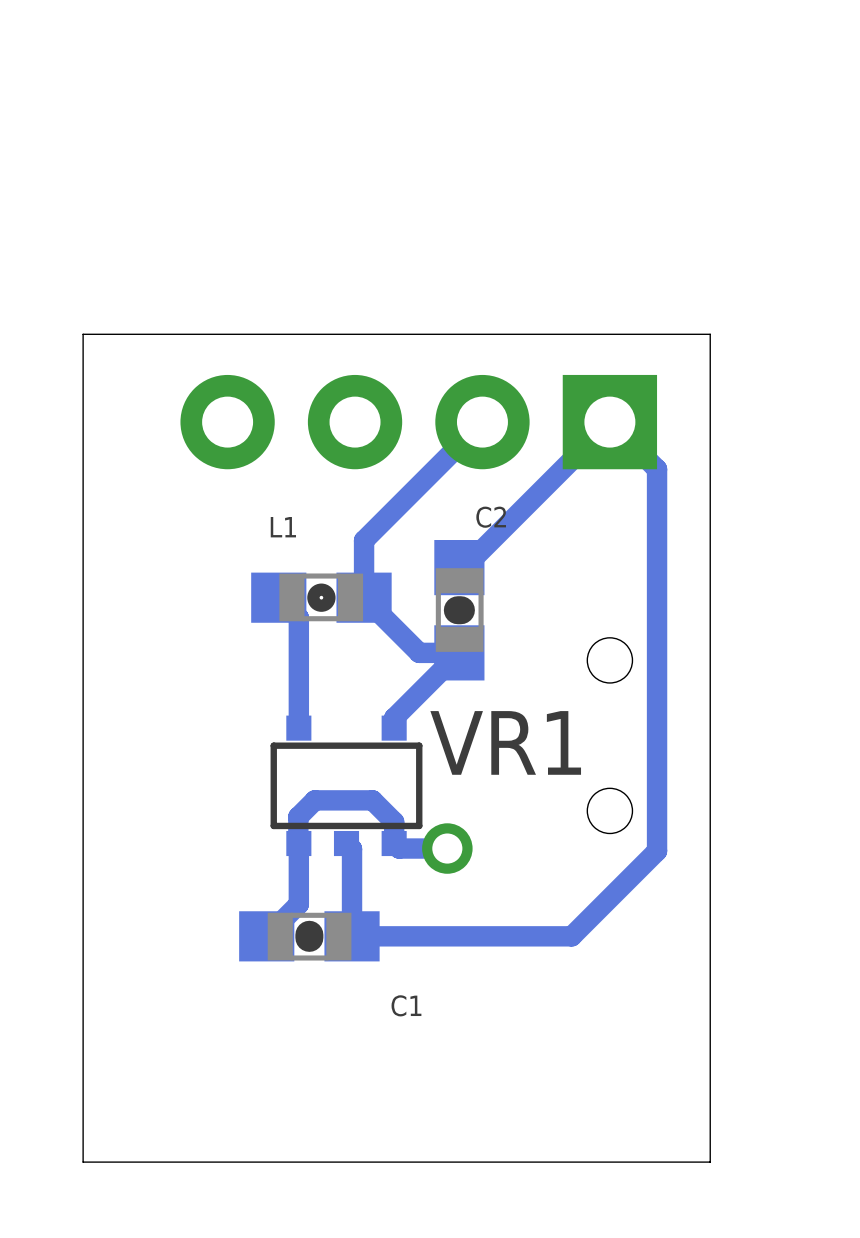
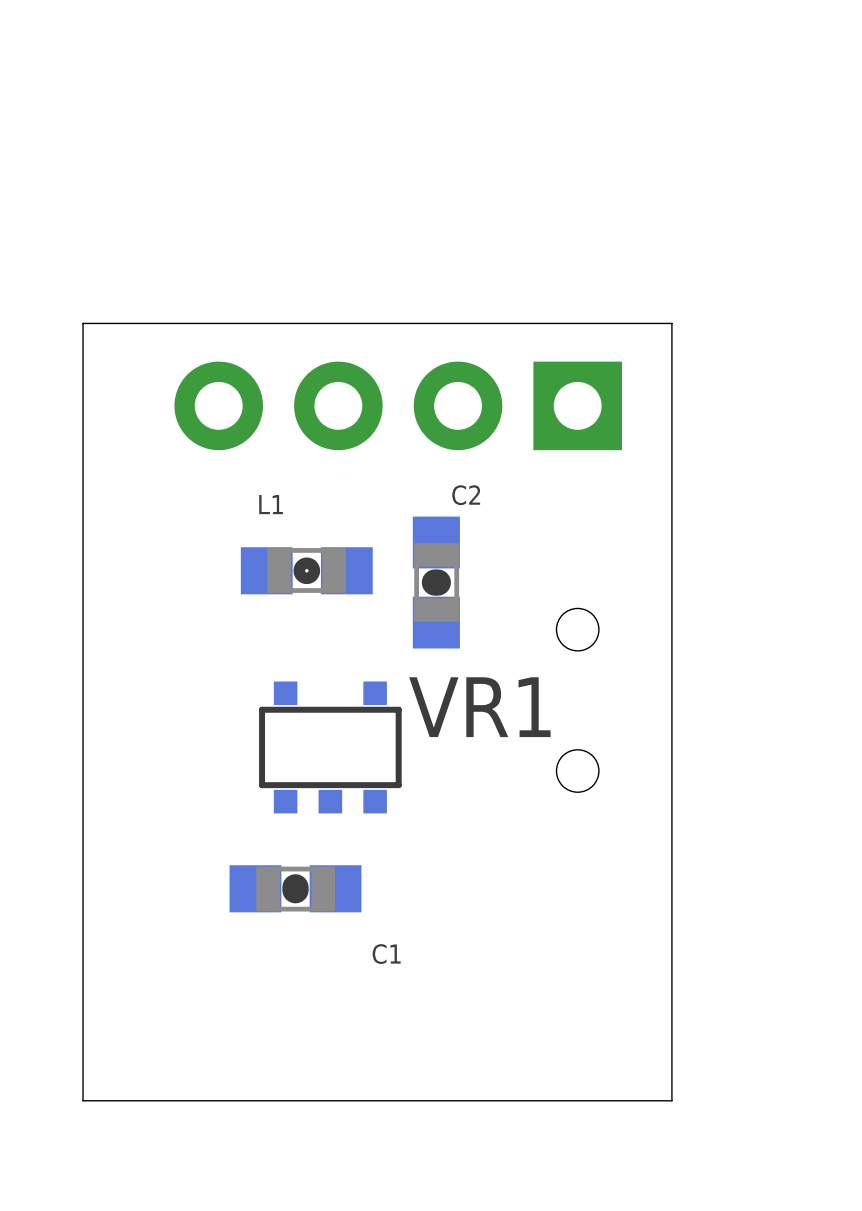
track: (482, 422) (364, 540) (364, 597) (419, 652) (459, 652) (394, 718) (394, 728) -> none
track: (459, 567) (464, 567) (609, 422) (657, 469) (657, 851) (571, 936) (352, 936) (352, 849) (346, 843) -> none
track: (278, 597) (298, 617) (298, 728) -> none
track: (298, 843) (298, 816) (314, 800) (372, 800) (394, 821) (394, 843) (399, 848) (447, 848) -> none
track: (298, 843) (298, 904) (266, 936) -> none
via: (447, 848) -> none

